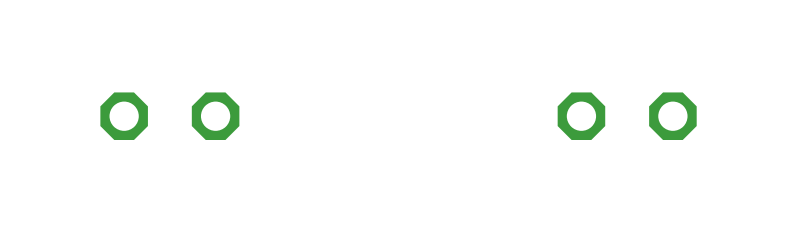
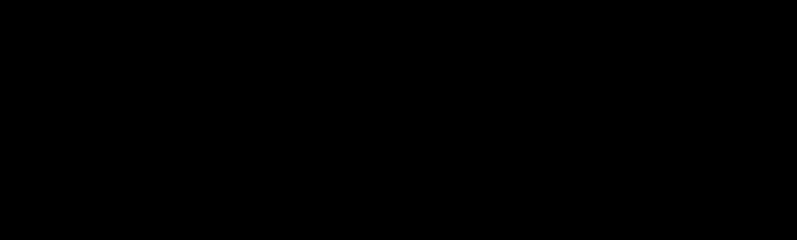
part: (169, 116) -> none
part: (627, 116) -> none

